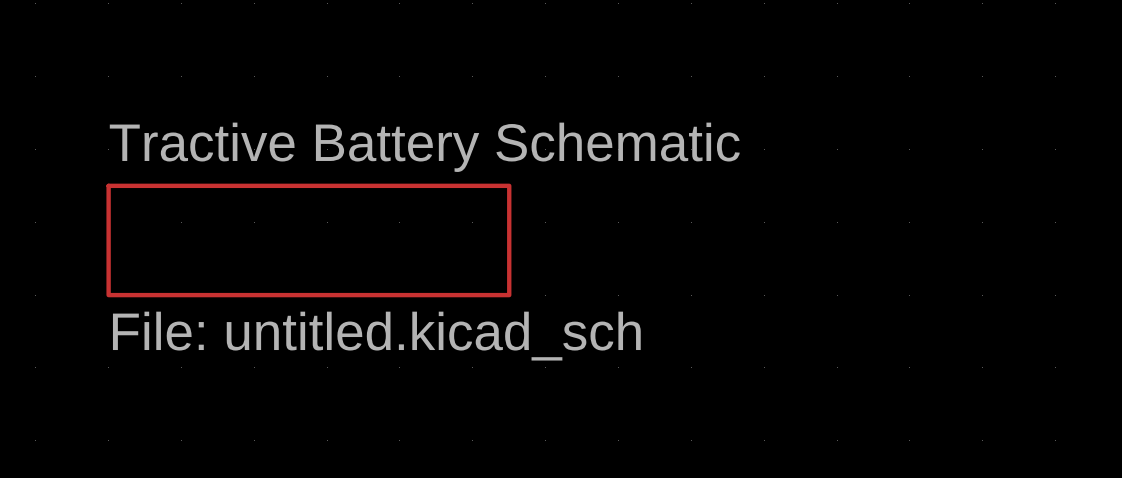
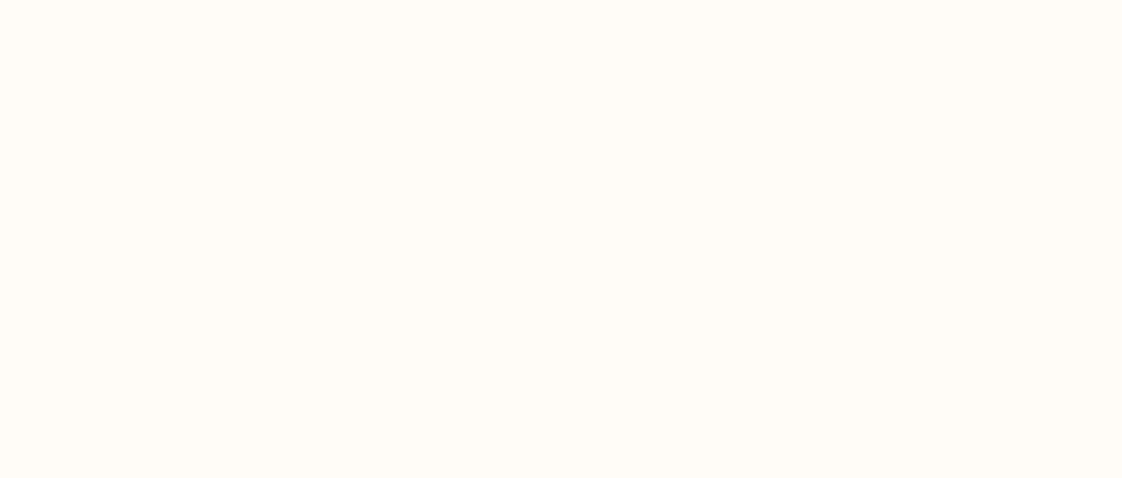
sheet Tractive Battery Schematic: File: untitled.kicad_sch (308, 240) -> none

